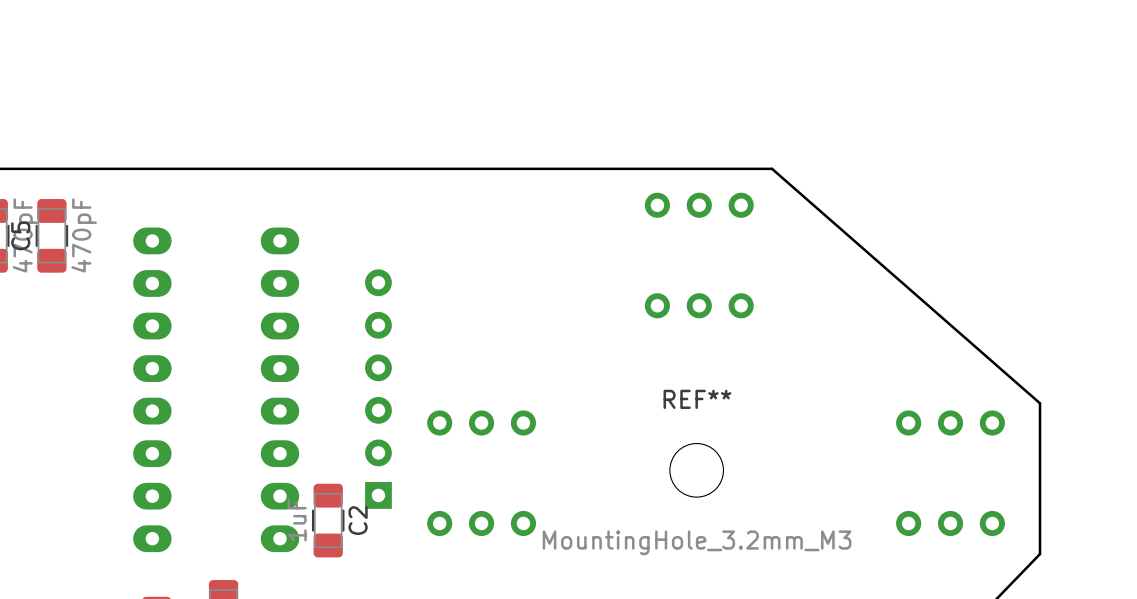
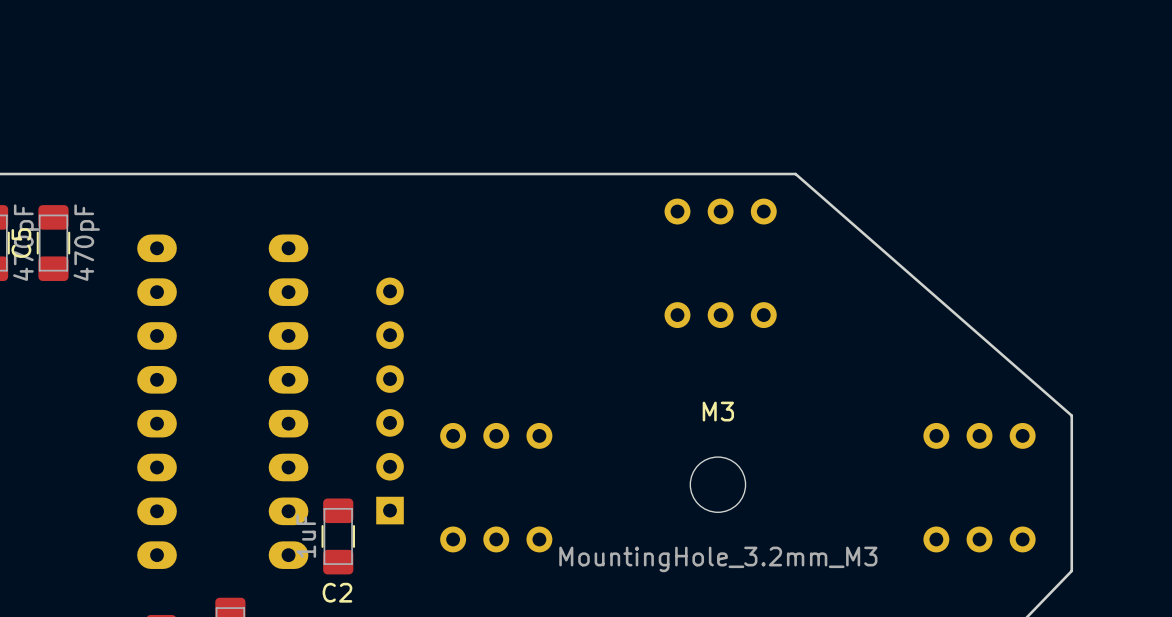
REF** name: REF** (697, 399) -> M3 (718, 411)
C2 name rotation: 0° (358, 520) -> 90° clockwise (337, 592)
C2 name position: C2 (358, 520) -> C2 (337, 592)

